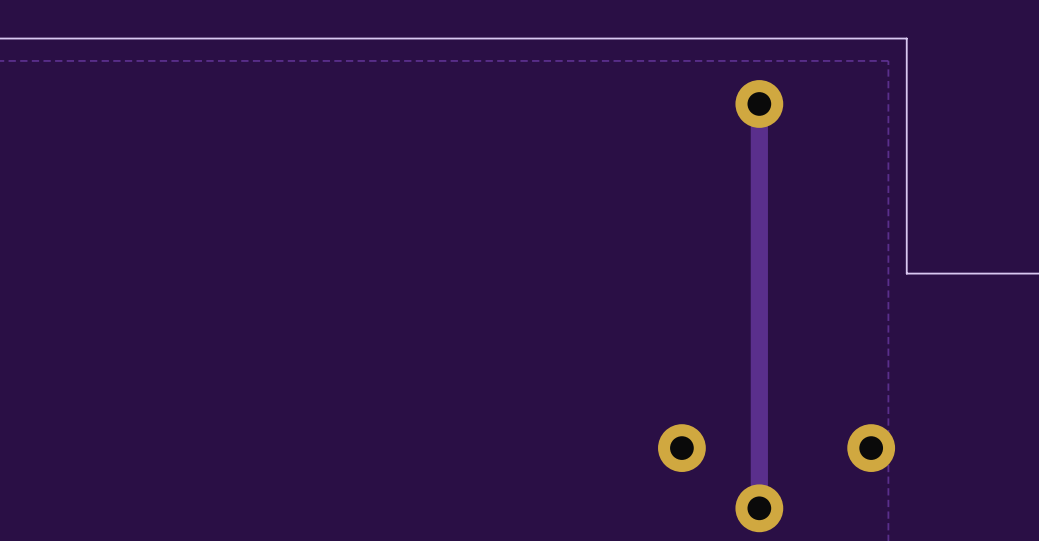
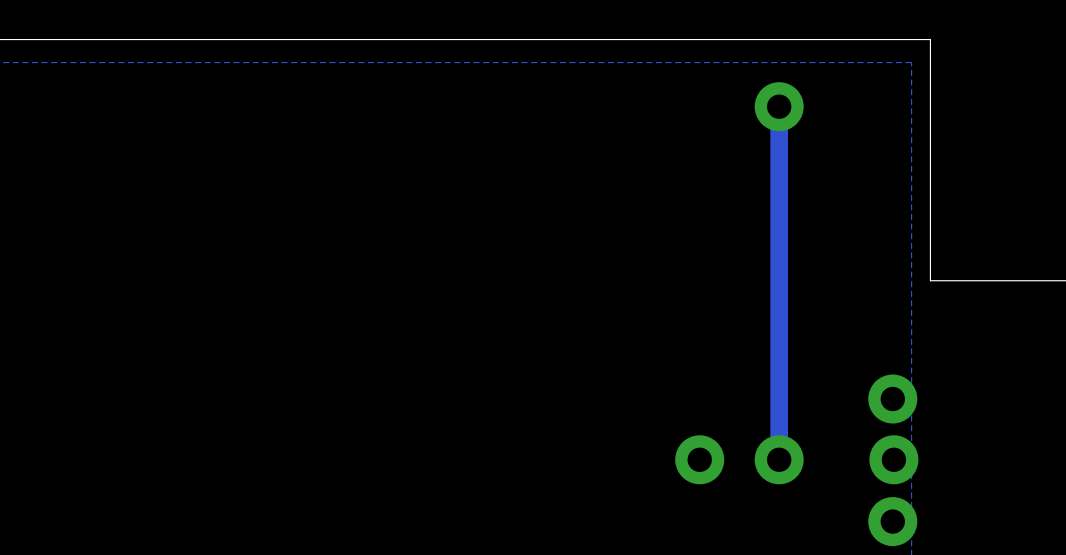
via: none -> (892, 399)
track: (759, 448) (759, 508) -> none
via: none -> (779, 459)
via: (759, 508) -> none
via: none -> (892, 521)

